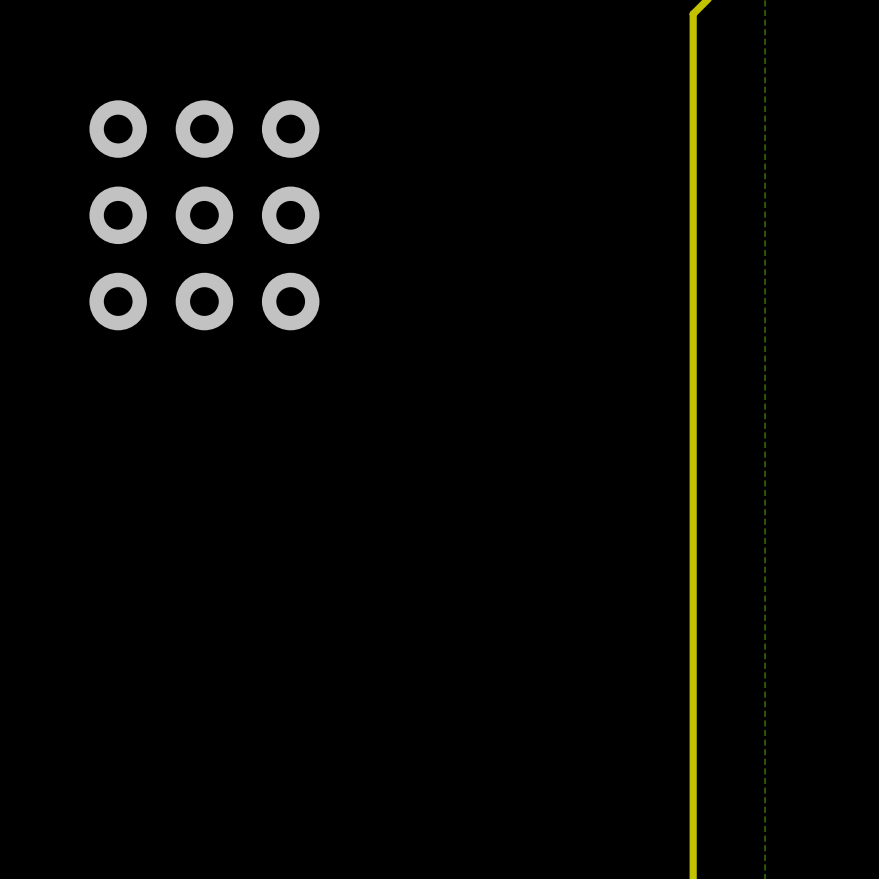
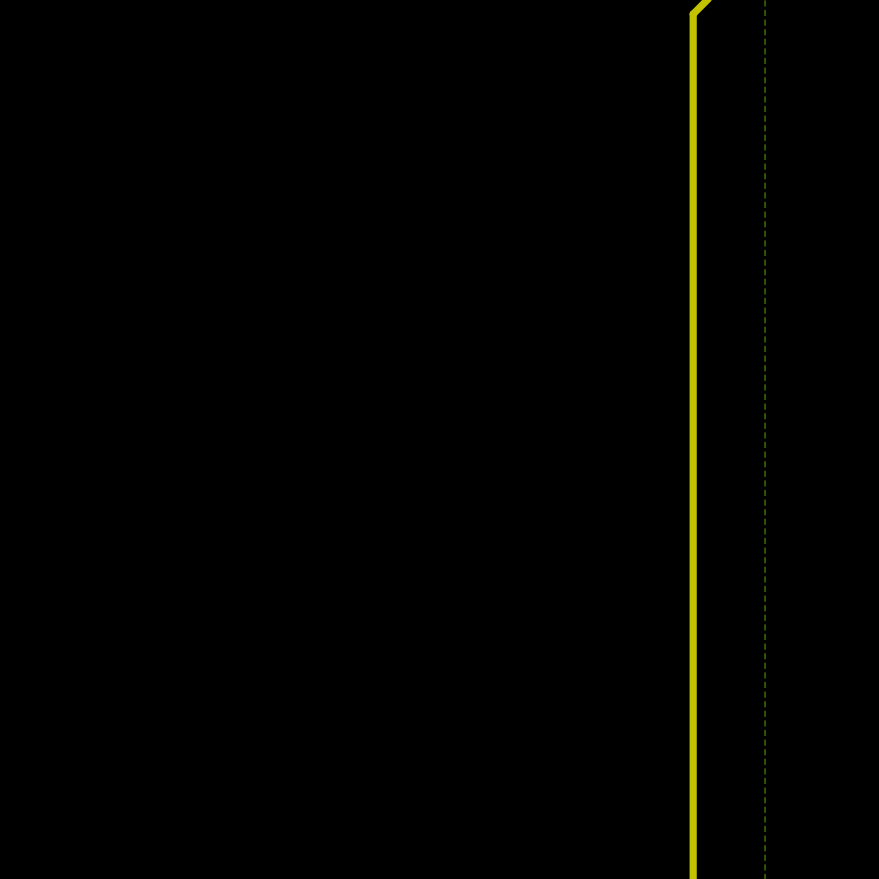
via: (118, 129) -> none
via: (204, 129) -> none
via: (290, 129) -> none
via: (118, 215) -> none
via: (204, 215) -> none
via: (290, 215) -> none
via: (118, 301) -> none
via: (204, 301) -> none
via: (290, 301) -> none

